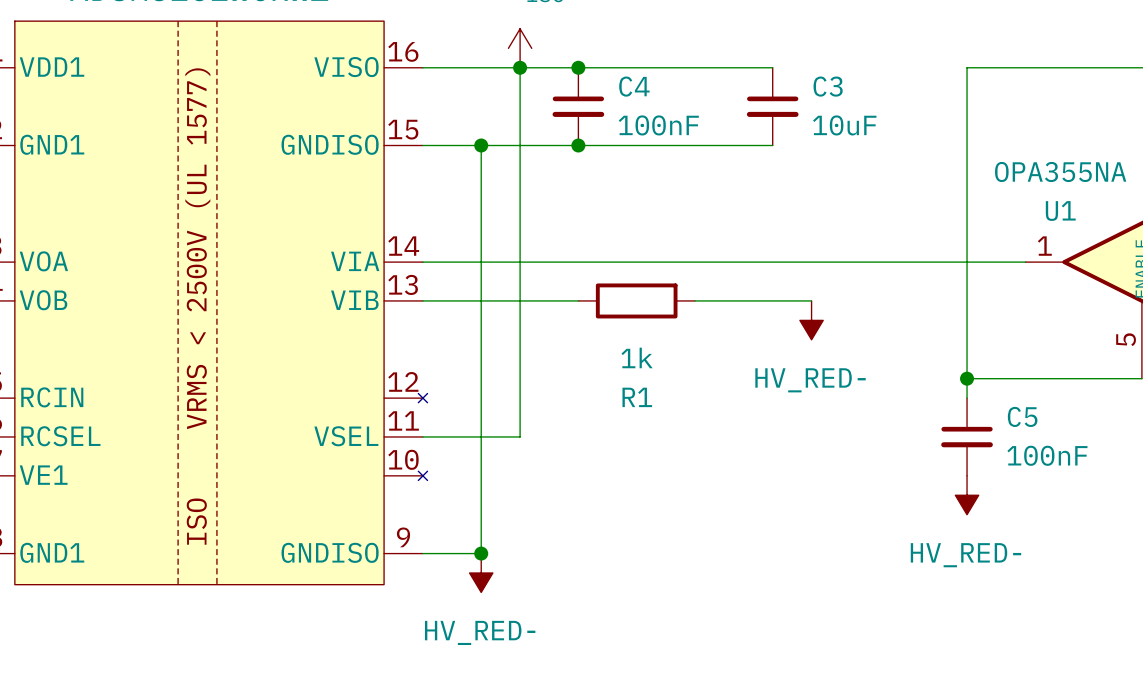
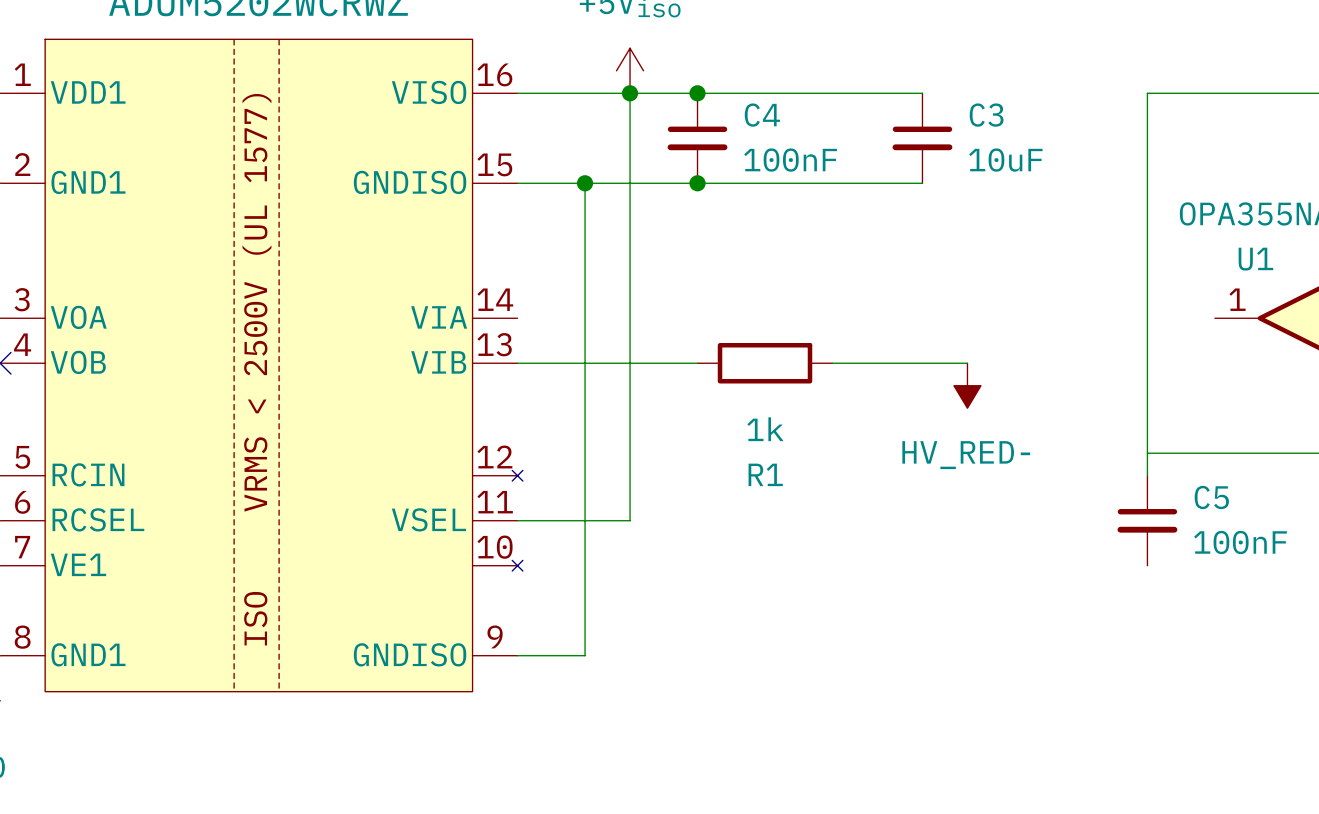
wire: (422, 262) (1025, 262) -> none
junction: (967, 378) -> none
power symbol: HV_RED- (967, 495) -> none
junction: (481, 553) -> none
power symbol: HV_RED- (481, 573) -> none

